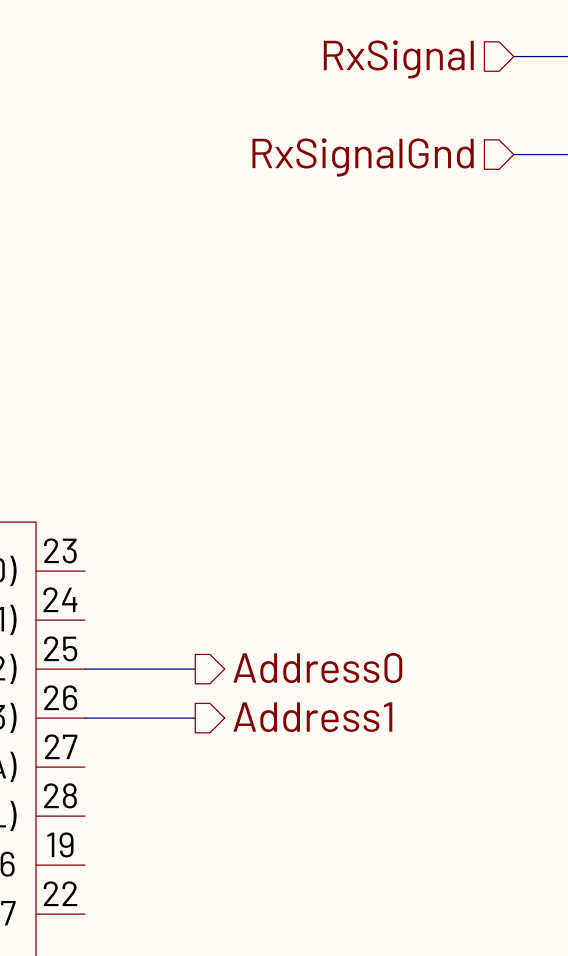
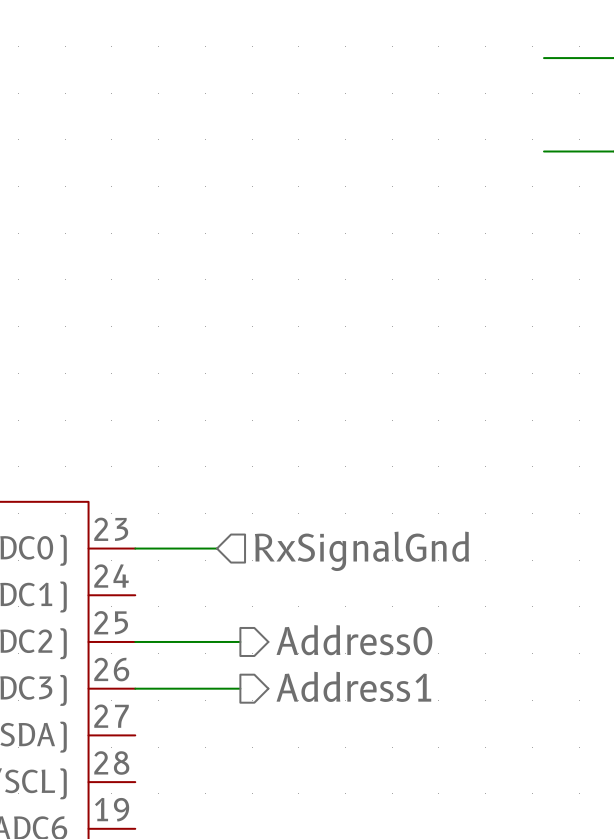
hierarchical label: RxSignal (398, 59) -> none
hierarchical label: RxSignalGnd (363, 157) -> none
wire: none -> (135, 548) (217, 548)
hierarchical label: none -> RxSignalGnd (361, 551)

